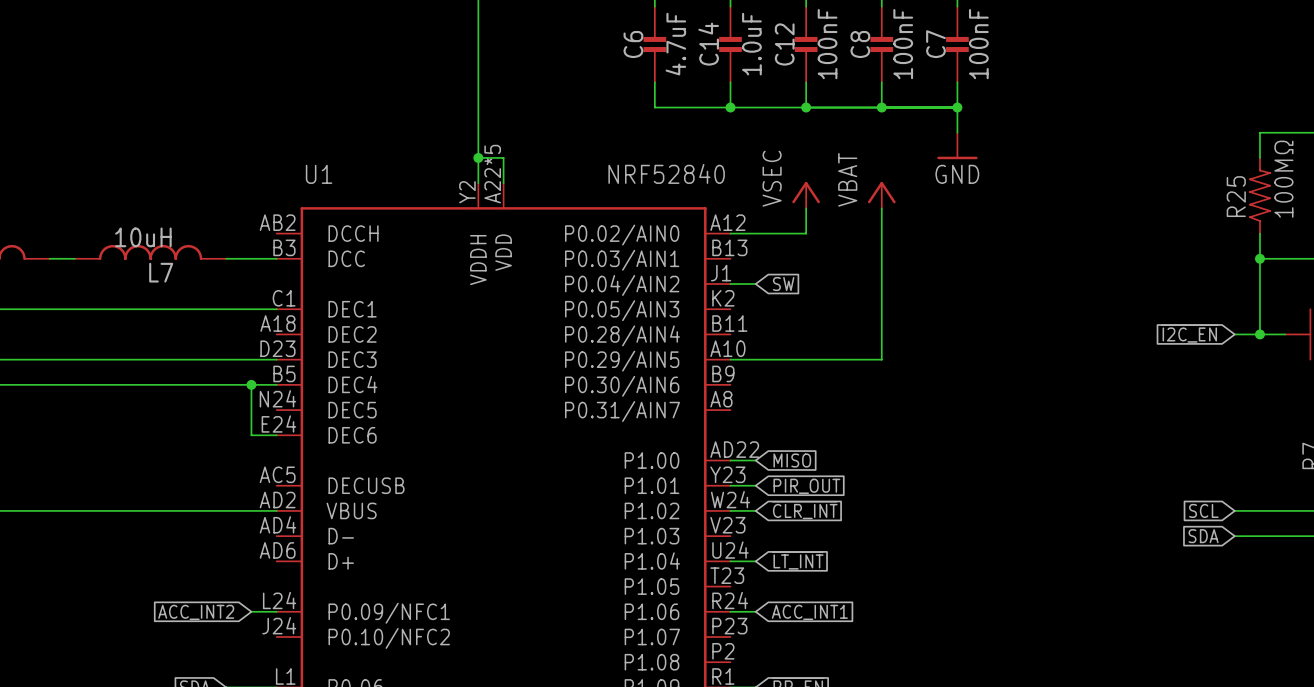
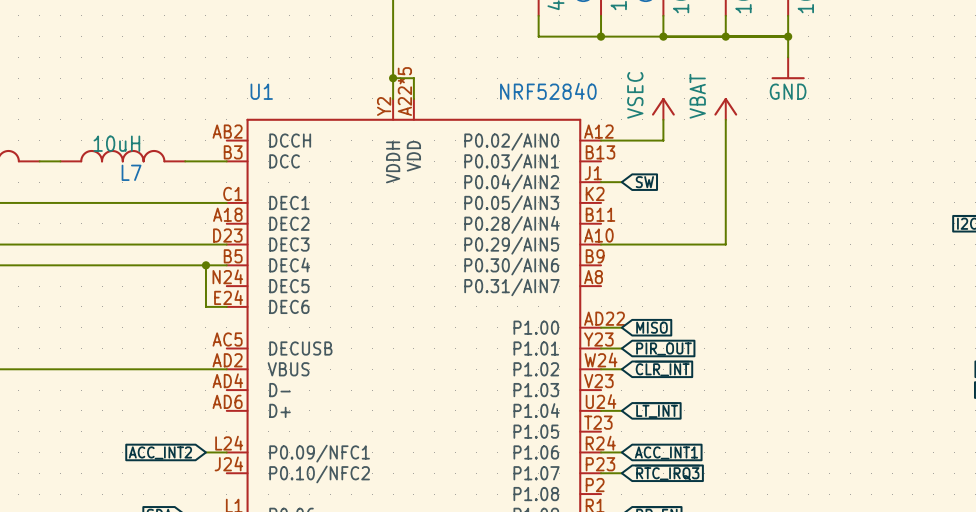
global label: none -> ~{RTC_IRQ3} (667, 472)
wire: none -> (601, 473) (621, 473)

